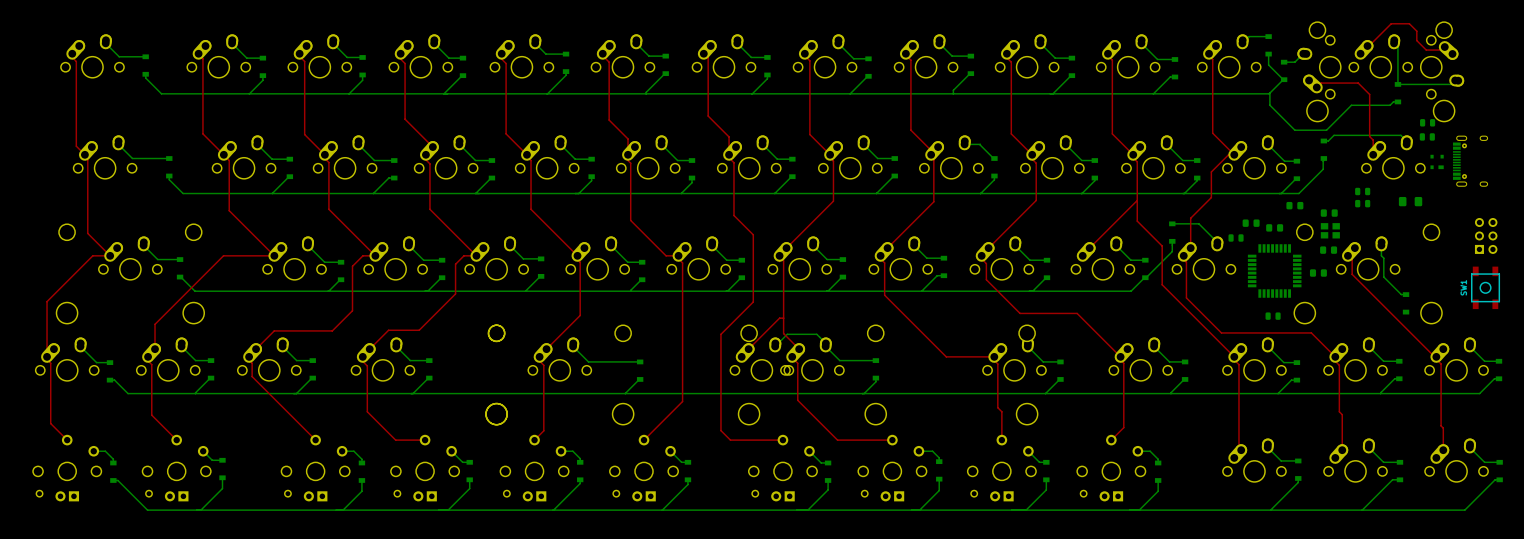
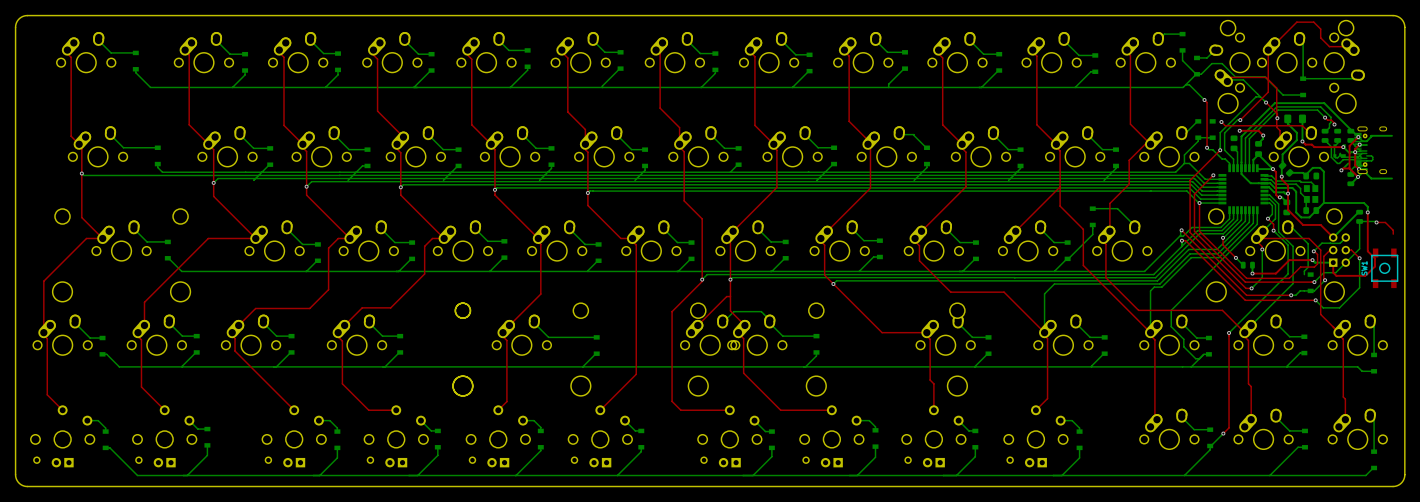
board edge: none -> (27, 15) (1396, 15) (1402, 20) (1404, 27) (1404, 477) (1400, 484) (1393, 486) (24, 486) (18, 481) (15, 474) (15, 27) (19, 19) (27, 15)
top track: none -> (1268, 50) (1268, 92) (1240, 120)
bottom track: none -> (1227, 81) (1243, 79) (1266, 102)
bottom track: none -> (1185, 84) (1189, 84) (1204, 100)
bottom track: (1269, 93) (1269, 105) (1294, 130) (1326, 130) (1351, 105) (1390, 105) (1393, 101) -> (1196, 74) (1201, 74) (1211, 63) (1222, 63) (1235, 76) (1264, 76) (1283, 95) (1298, 95)
bottom track: none -> (1260, 96) (1256, 96) (1220, 132) (1220, 150)
top track: none -> (1204, 100) (1207, 102) (1207, 147)
via: none -> (1204, 100)
top track: none -> (1266, 102) (1277, 113) (1277, 118)
via: none -> (1266, 102)
part: (1427, 122) -> none
via: none -> (1277, 118)
bottom track: none -> (1325, 117) (1317, 110) (1277, 110) (1249, 138) (1249, 168)
top track: none -> (1325, 117) (1331, 120) (1334, 124)
via: none -> (1325, 117)
bottom track: none -> (1287, 118) (1287, 123) (1296, 132) (1296, 140) (1282, 154) (1281, 176)
bottom track: none -> (1302, 118) (1302, 141)
bottom track: none -> (1240, 120) (1237, 120) (1224, 133) (1224, 150) (1233, 159) (1233, 168)
via: none -> (1240, 120)
top track: none -> (1221, 122) (1225, 125) (1302, 125) (1311, 134)
via: none -> (1221, 122)
via: none -> (1334, 124)
part: (1427, 136) -> none
part: none -> (1198, 129)
part: none -> (1212, 129)
part footprint: [1320, 138, 1328, 161] -> [1230, 135, 1238, 152]
bottom track: (1323, 140) (1328, 140) (1334, 135) (1400, 135) (1406, 141) -> none
top track: none -> (1239, 130) (1258, 130) (1263, 135)
via: none -> (1239, 130)
bottom track: none -> (1325, 131) (1329, 127) (1330, 117) (1320, 106) (1276, 106) (1245, 138) (1245, 168)
bottom track: (1267, 144) (1284, 161) (1296, 161) -> (1181, 134) (1184, 134) (1198, 121)
bottom track: none -> (1263, 135) (1258, 143)
via: none -> (1263, 135)
part: none -> (1325, 135)
part: none -> (1337, 135)
part: none -> (1350, 135)
bottom track: none -> (1391, 135) (1371, 135) (1366, 141) (1362, 141) (1324, 103) (1274, 103) (1241, 136) (1241, 174) (1250, 183) (1270, 183) (1274, 187) (1292, 187) (1296, 191) (1296, 212) (1301, 217) (1309, 217) (1323, 203)
bottom track: none -> (1212, 137) (1198, 137) (1198, 141) (1184, 154) (1184, 163)
top track: none -> (1358, 137) (1349, 145) (1349, 168)
via: none -> (1358, 137)
bottom track: none -> (1325, 140) (1331, 146) (1331, 157) (1337, 163) (1343, 159) (1372, 159) (1371, 155) (1366, 155)
bottom track: none -> (1337, 140) (1334, 146) (1334, 156) (1337, 157) (1340, 153)
bottom track: none -> (1351, 140) (1360, 150) (1366, 150)
top track: none -> (1302, 141) (1314, 147) (1343, 147)
via: none -> (1302, 141)
bottom track: none -> (1359, 144) (1366, 144)
top track: none -> (1359, 144) (1355, 149) (1355, 165) (1359, 169)
via: none -> (1359, 144)
bottom track: none -> (1343, 147) (1349, 153)
via: none -> (1343, 147)
bottom track: none -> (1207, 147) (1212, 149) (1222, 159) (1225, 159) (1229, 163) (1229, 168)
via: none -> (1207, 147)
bottom track: none -> (1234, 148) (1237, 151) (1237, 168)
bottom track: (1325, 159) (1323, 161) (1323, 169) (1298, 193) (183, 193) (174, 184) -> (730, 172) (162, 172)
part: none -> (1258, 148)
top track: none -> (1220, 150) (1190, 180) (1190, 232) (1245, 288) (1251, 288)
via: none -> (1220, 150)
bottom track: none -> (1355, 152) (1349, 153)
via: none -> (1355, 152)
bottom track: none -> (1340, 153) (1342, 157) (1358, 157) (1362, 153)
bottom track: none -> (1362, 153) (1366, 153)
bottom track: none -> (1258, 154) (1272, 169) (1257, 168)
bottom track: none -> (1258, 154) (1253, 159) (1253, 168)
bottom track: none -> (1359, 155) (1361, 158) (1366, 158)
part: (1296, 169) -> none
bottom track: none -> (1184, 163) (1189, 163) (1205, 179) (1222, 179)
bottom track: none -> (1348, 163) (1341, 169)
bottom track: none -> (1366, 165) (1357, 164) (1350, 170) (1350, 174)
bottom track: (1296, 178) (1281, 193) -> none
top track: none -> (1349, 168) (1358, 176)
top track: none -> (1349, 168) (1341, 170)
top track: none -> (1272, 169) (1276, 172) (1276, 194) (1279, 197)
via: none -> (1272, 169)
part: none -> (1286, 169)
bottom track: none -> (1359, 169) (1366, 169)
via: none -> (1359, 169)
via: none -> (1341, 170)
bottom track: (783, 184) (774, 193) -> (730, 172) (1175, 172) (1184, 163)
bottom track: none -> (1289, 172) (1303, 172) (1306, 176) (1312, 167) (1320, 167) (1323, 171) (1323, 203)
bottom track: none -> (81, 173) (83, 175) (1196, 175) (1204, 183) (1222, 183)
via: none -> (81, 173)
top track: none -> (1213, 175) (1194, 194) (1194, 231) (1245, 282) (1314, 282)
via: none -> (1213, 175)
bottom track: none -> (1264, 175) (1271, 176) (1276, 181) (1311, 182) (1315, 186)
part: none -> (1311, 176)
top track: none -> (1281, 176) (1281, 179) (1288, 185) (1288, 209) (1303, 224) (1320, 224) (1333, 237)
via: none -> (1281, 176)
via: none -> (1358, 176)
part: (1362, 191) -> none
bottom track: none -> (1391, 178) (1371, 178) (1366, 173) (1361, 173) (1350, 183)
bottom track: none -> (1264, 179) (1271, 179) (1275, 184) (1296, 184) (1306, 199) (1306, 210)
part: none -> (1350, 179)
bottom track: none -> (213, 182) (218, 178) (1194, 178) (1203, 187) (1222, 187)
via: none -> (213, 182)
bottom track: none -> (306, 186) (311, 181) (1192, 181) (1202, 191) (1222, 191)
via: none -> (306, 186)
bottom track: none -> (400, 187) (403, 184) (1191, 184) (1201, 195) (1222, 195)
via: none -> (400, 187)
bottom track: none -> (1264, 187) (1269, 187) (1274, 192) (1288, 193) (1286, 202) (1279, 197)
part position: (1410, 201) -> (1295, 118)
bottom track: none -> (494, 189) (496, 187) (1189, 187) (1200, 199) (1222, 199)
via: none -> (494, 189)
part: (1362, 203) -> none
part: (1294, 205) -> none
bottom track: none -> (587, 192) (589, 190) (1186, 191) (1198, 203) (1222, 203)
via: none -> (587, 192)
via: none -> (1288, 193)
bottom track: none -> (1264, 195) (1269, 195) (1278, 204) (1278, 231) (1293, 246) (1293, 283) (1251, 325)
via: none -> (1279, 197)
part: (1329, 213) -> none
bottom track: none -> (1264, 199) (1269, 199) (1275, 204) (1275, 218) (1262, 231)
top track: none -> (1199, 203) (1199, 231) (1246, 278) (1289, 278) (1300, 267) (1314, 267) (1317, 263) (1317, 254) (1313, 251)
via: none -> (1199, 203)
bottom track: none -> (1264, 203) (1269, 203) (1272, 205) (1272, 214) (1267, 218)
bottom track: none -> (1323, 203) (1364, 203) (1367, 206) (1367, 212)
part: none -> (1286, 207)
part: (1251, 223) -> none
bottom track: none -> (1229, 210) (1229, 218) (1220, 227) (1191, 227) (1183, 236) (1179, 236) (1144, 271) (1054, 271)
bottom track: none -> (1233, 210) (1233, 219) (1222, 230) (1197, 230) (1153, 274) (707, 274) (702, 279)
bottom track: none -> (1237, 210) (1237, 219) (1223, 233) (1199, 233) (1155, 277) (732, 277) (730, 279)
bottom track: none -> (1241, 210) (1241, 220) (1223, 237)
bottom track: none -> (1245, 210) (1245, 221) (1217, 249) (1188, 249) (1157, 280) (836, 280) (833, 284)
bottom track: none -> (1249, 210) (1249, 222) (1217, 253) (1190, 253) (1159, 284) (1054, 284) (1044, 293) (1044, 332)
bottom track: none -> (1253, 210) (1253, 223) (1218, 257) (1191, 257) (1161, 287) (1154, 287) (1150, 290) (1150, 332)
bottom track: none -> (1257, 210) (1257, 224) (1171, 310) (1171, 326) (1183, 339) (1183, 346) (1195, 358) (1199, 358)
part: none -> (1311, 210)
part: (1274, 227) -> none
bottom track: none -> (1359, 212) (1333, 237)
top track: none -> (1367, 212) (1367, 251) (1374, 258) (1374, 266) (1365, 275) (1336, 275) (1333, 272) (1333, 262)
via: none -> (1367, 212)
part rotation: 0° (1330, 230) -> 90° clockwise (1311, 194)
part position: (1330, 230) -> (1311, 194)
part: none -> (1359, 216)
top track: none -> (1267, 218) (1273, 224) (1273, 230)
via: none -> (1267, 218)
part position: (1486, 235) -> (1339, 250)
part: (1236, 237) -> none
bottom track: none -> (1376, 222) (1359, 221) (1359, 248) (1335, 272) (1323, 272) (1314, 282)
top track: none -> (1376, 222) (1385, 222) (1393, 230) (1393, 234)
via: none -> (1376, 222)
bottom track: (1381, 245) (1383, 277) (1401, 294) (1406, 294) -> (1287, 228) (1293, 228) (1308, 243) (1308, 267) (1304, 271) (1304, 274)
bottom track: none -> (1181, 230) (1180, 236)
top track: none -> (1181, 230) (1246, 295) (1291, 295)
via: none -> (1181, 230)
bottom track: none -> (1273, 230) (1288, 245) (1288, 273) (1229, 332)
via: none -> (1273, 230)
part: (1328, 250) -> none
bottom track: none -> (1345, 237) (1339, 243) (1321, 243) (1313, 251)
top track: none -> (1223, 237) (1223, 244) (1235, 257)
via: none -> (1223, 237)
bottom track: none -> (1181, 240) (1181, 246)
top track: none -> (1181, 240) (1185, 240) (1245, 300) (1315, 300)
via: none -> (1181, 240)
top track: (1350, 258) (1352, 274) (1434, 356) -> none
bottom track: none -> (1262, 249) (1262, 277) (1251, 288)
top track: none -> (1262, 249) (1256, 238) (1309, 238) (1320, 250) (1320, 314) (1338, 332)
via: none -> (1262, 249)
top track: none -> (1333, 250) (1330, 250) (1323, 256) (1325, 280)
top track: none -> (1345, 250) (1351, 250) (1359, 258)
via: none -> (1313, 251)
part position: (1274, 270) -> (1243, 189)
part: (1318, 273) -> none
bottom track: none -> (1235, 257) (1243, 265)
via: none -> (1235, 257)
bottom track: none -> (1359, 258) (1359, 287) (1339, 307) (1323, 307) (1315, 300)
via: none -> (1359, 258)
bottom track: none -> (1312, 260) (1315, 262) (1333, 262)
top track: none -> (1312, 260) (1289, 260) (1275, 273) (1252, 273)
via: none -> (1312, 260)
part: none -> (1247, 265)
bottom track: none -> (1252, 265) (1252, 273)
via: none -> (1252, 273)
via: none -> (702, 279)
via: none -> (730, 279)
bottom track: none -> (1325, 280) (1314, 290) (1300, 290) (1295, 295) (1291, 295)
via: none -> (1325, 280)
via: none -> (1314, 282)
via: none -> (833, 284)
via: none -> (1251, 288)
part: (1273, 316) -> none
via: none -> (1291, 295)
via: none -> (1315, 300)
bottom track: (1474, 350) (1484, 361) (1499, 361) -> (1374, 326) (1374, 354)
top track: none -> (1229, 332) (1229, 427) (1223, 433)
via: none -> (1229, 332)
part position: (1499, 370) -> (1374, 363)
bottom track: (1499, 378) (1494, 378) (1479, 393) (1456, 393) -> (1374, 371) (1362, 371) (1357, 366)
bottom track: none -> (1370, 414) (1374, 418) (1374, 451)
bottom track: (1469, 447) (1484, 462) (1499, 462) -> none
bottom track: none -> (1223, 433) (1210, 446)
via: none -> (1223, 433)
part position: (1499, 471) -> (1374, 459)
bottom track: (1499, 479) (1495, 479) (1464, 510) -> (1374, 467) (1365, 475)

